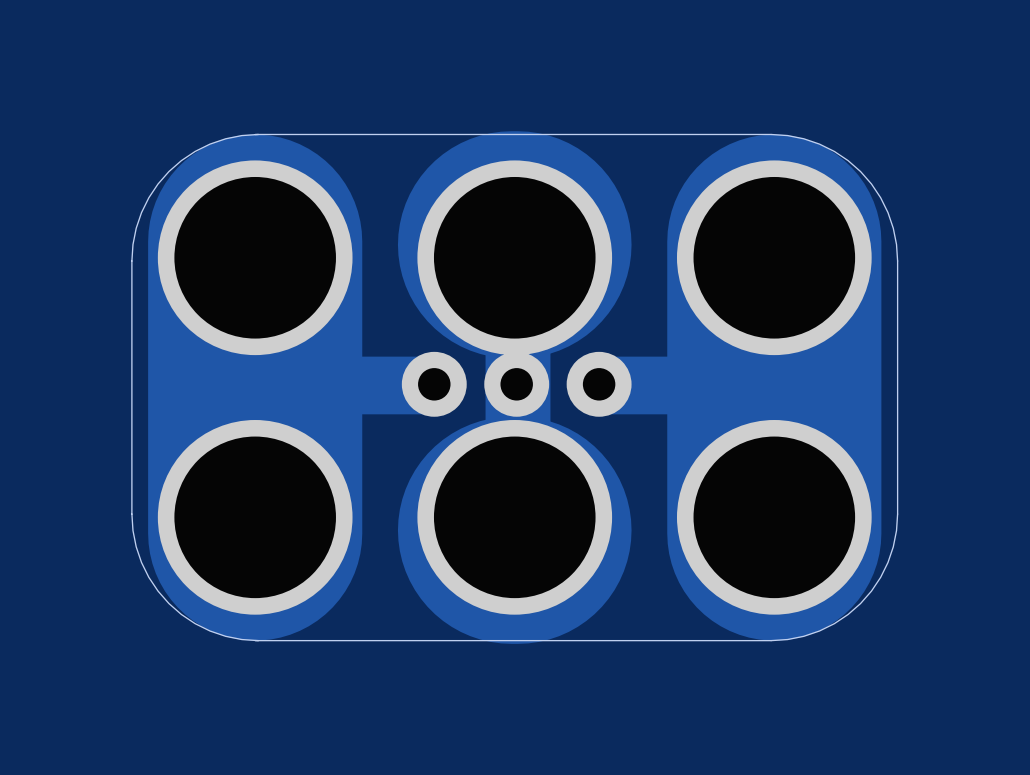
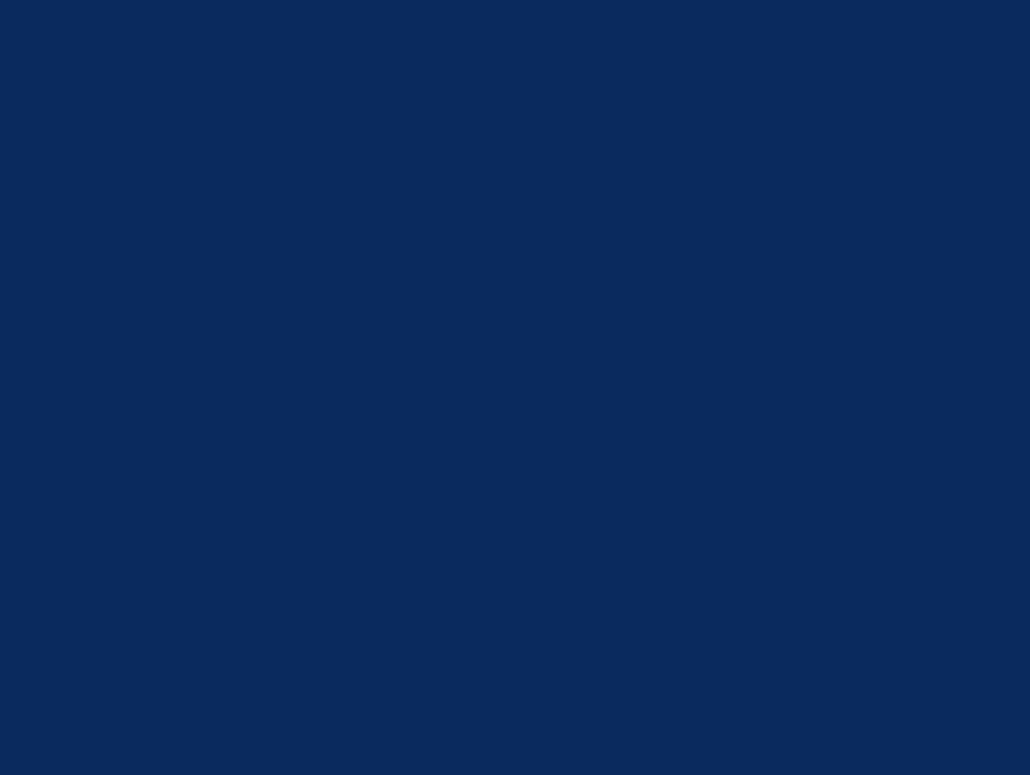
part: (514, 387) -> none

